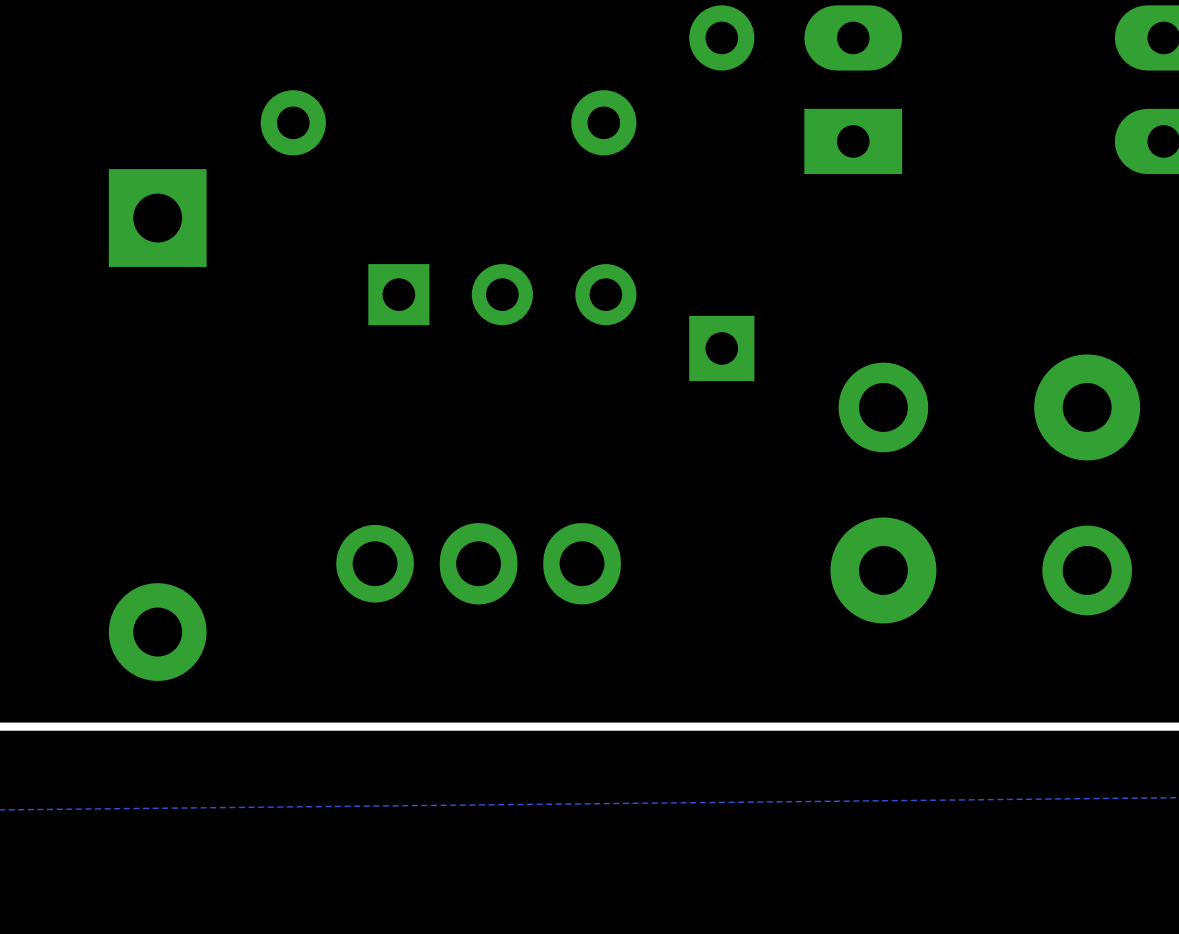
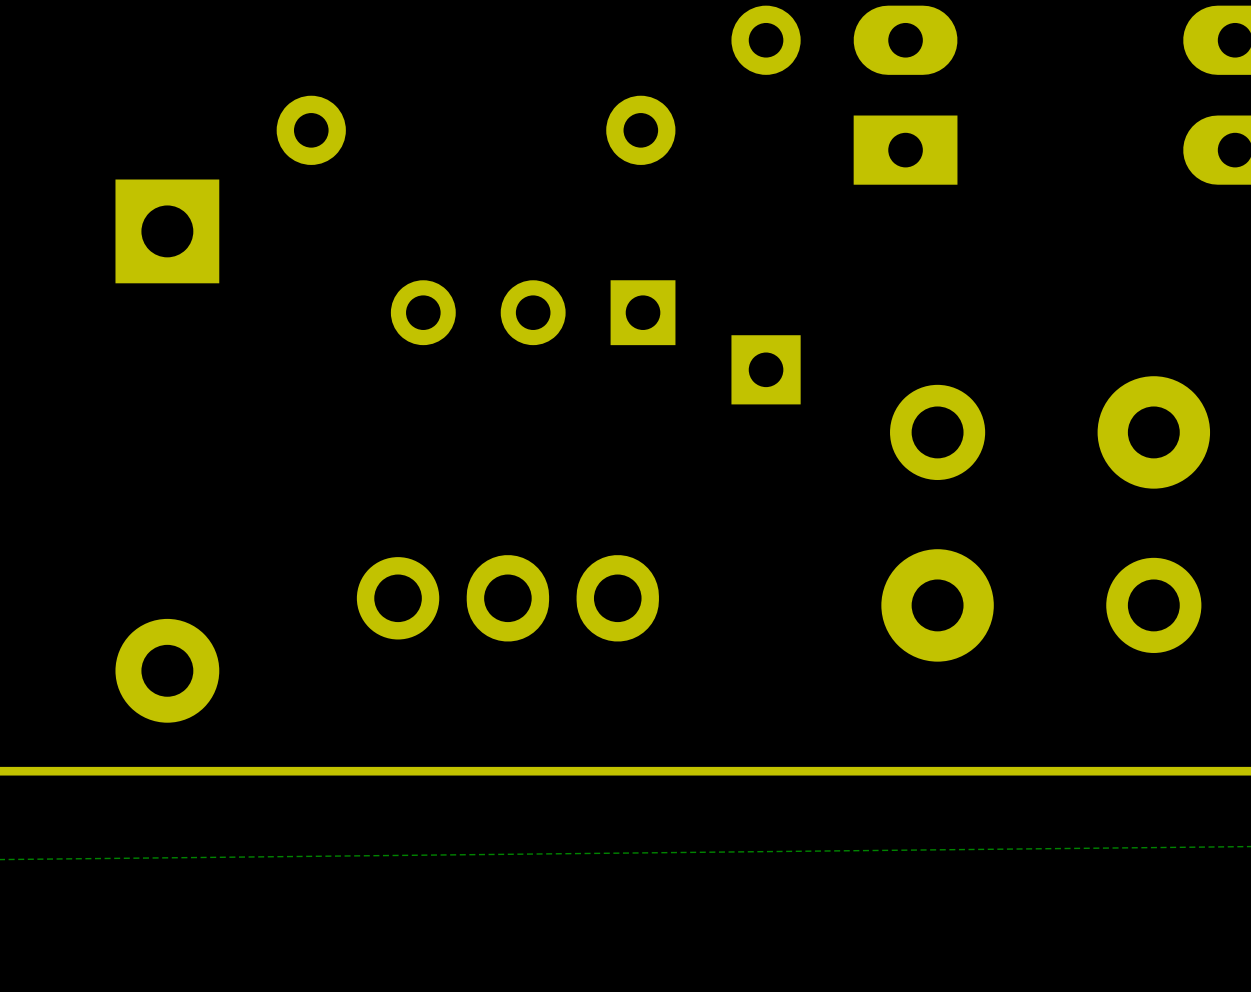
part rotation: 0° (502, 294) -> 180° (533, 312)

